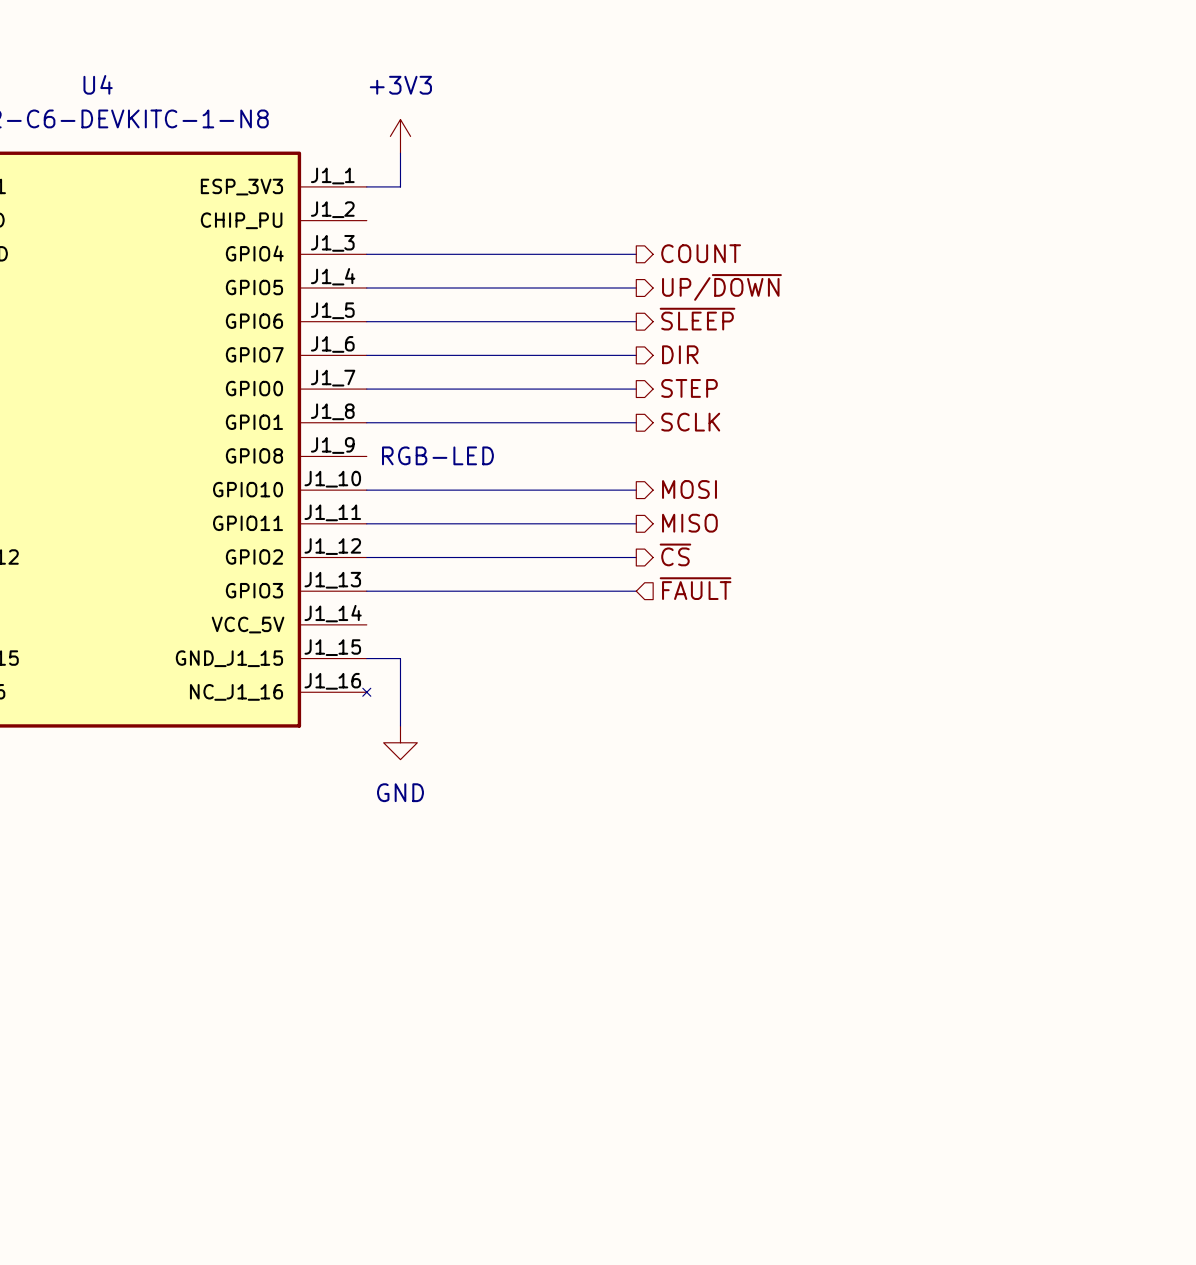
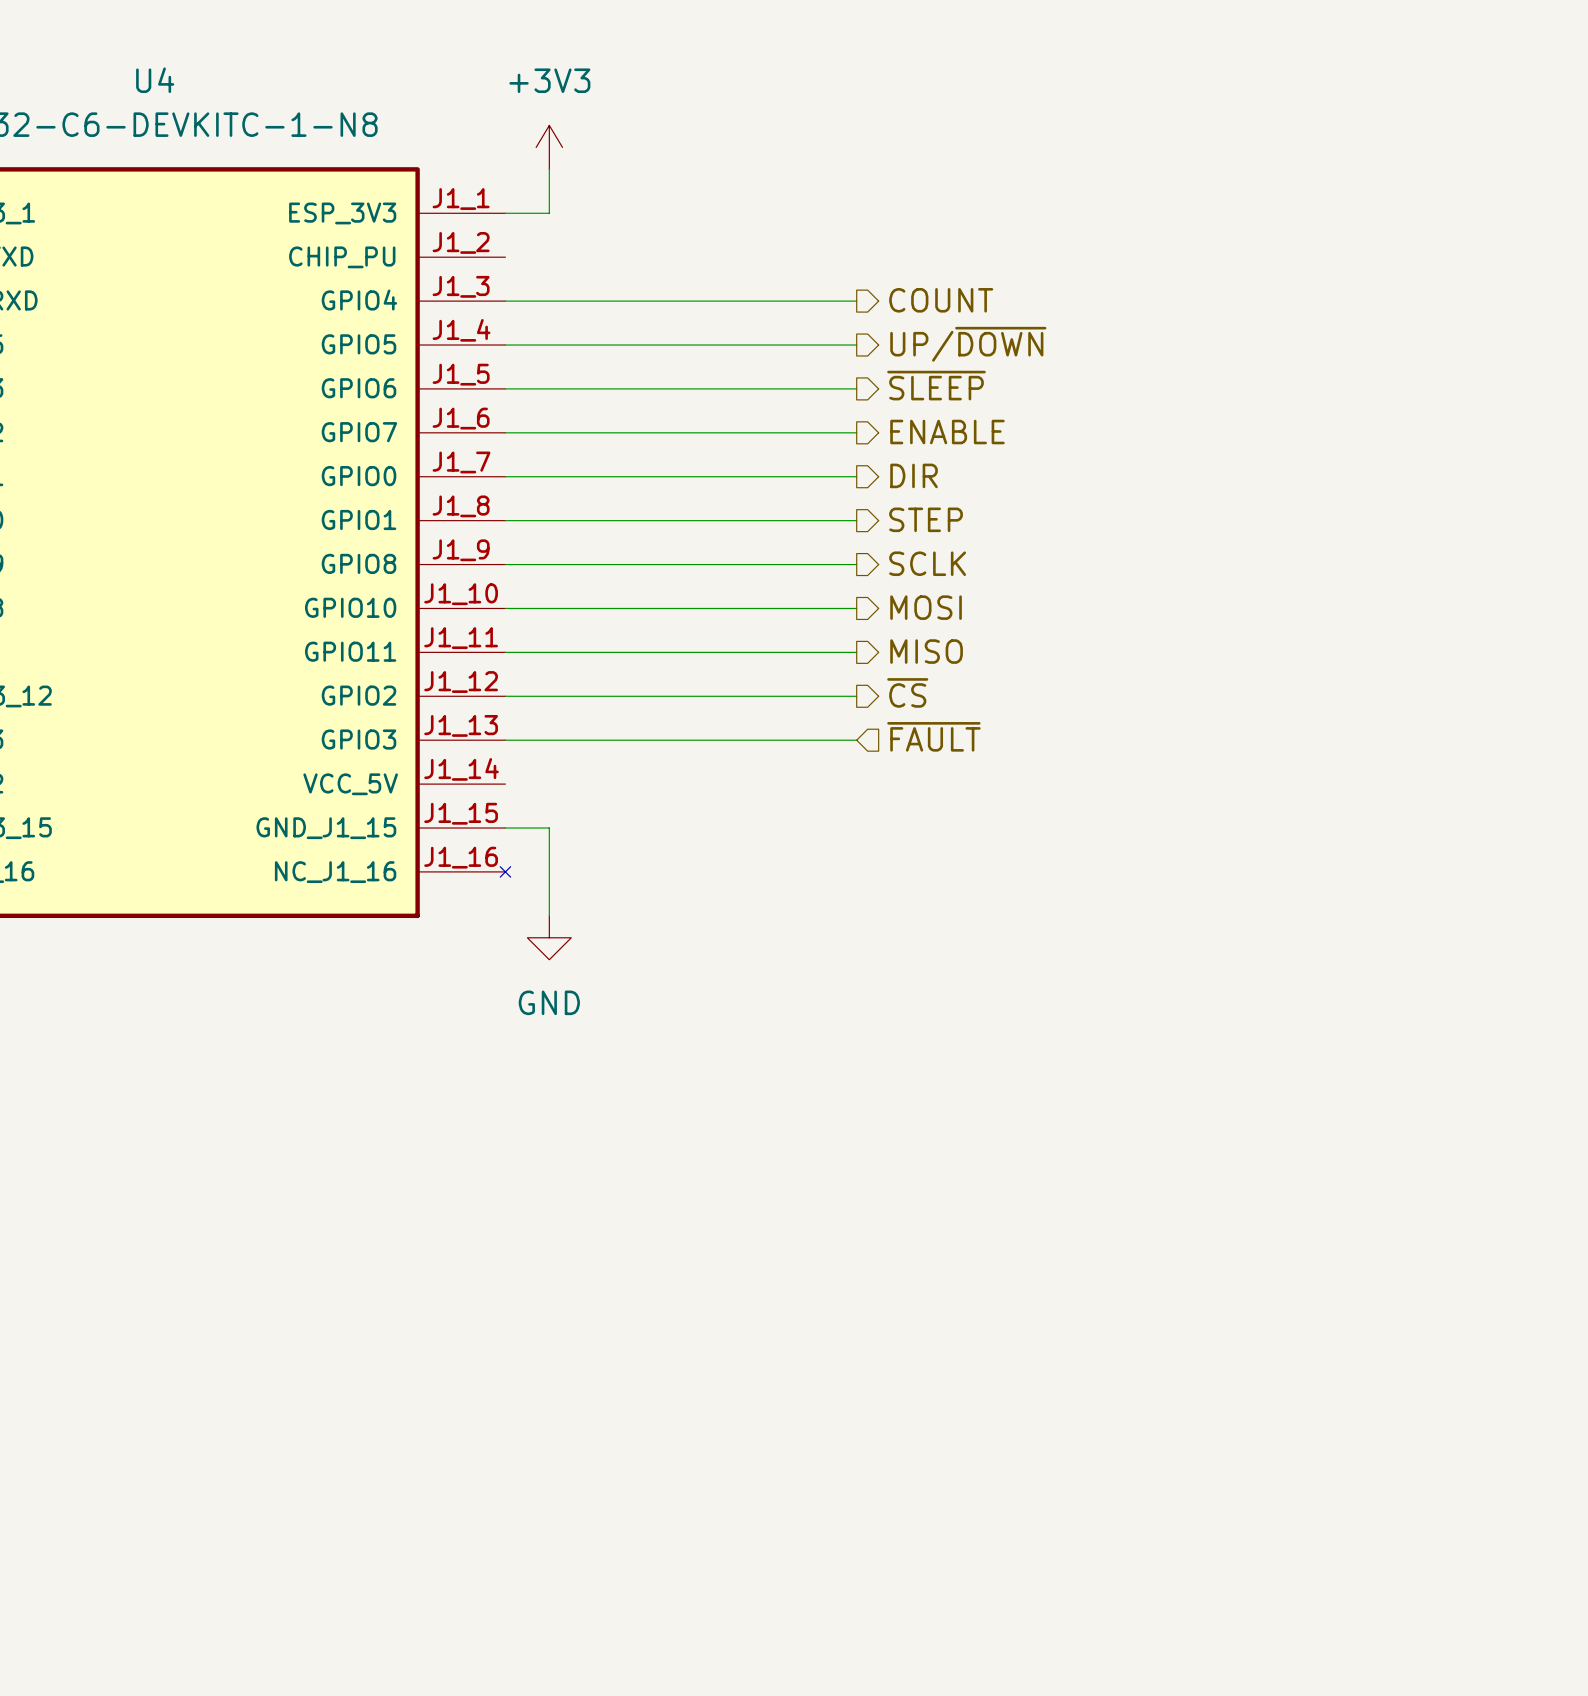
hierarchical label: DIR (680, 354) -> ENABLE (947, 432)
hierarchical label: STEP (689, 388) -> DIR (914, 475)
hierarchical label: SCLK (690, 422) -> STEP (926, 519)
text: RGB-LED (437, 455) -> none
hierarchical label: none -> SCLK (927, 563)
wire: none -> (505, 564) (856, 564)

